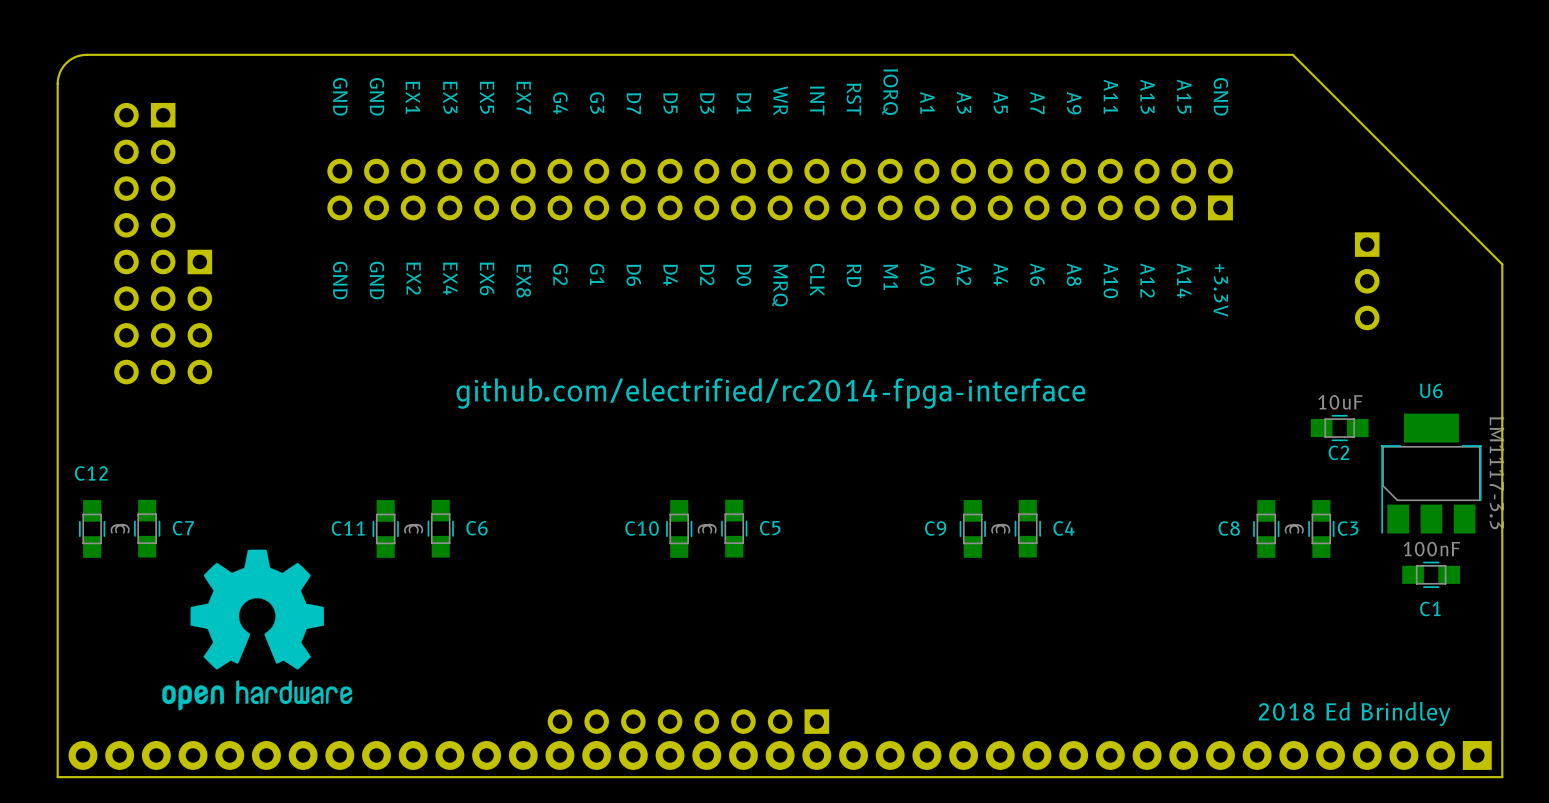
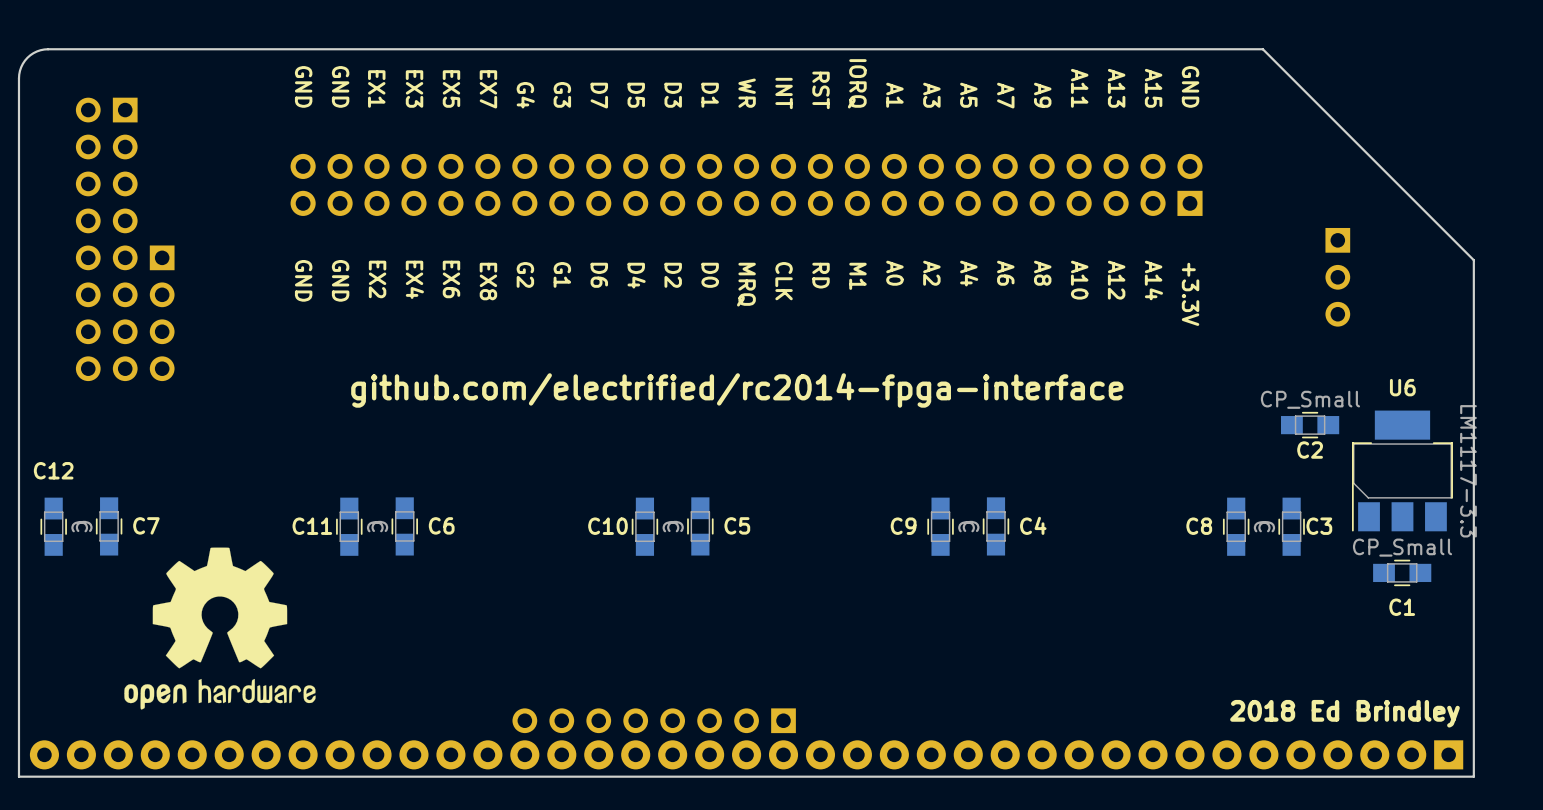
C2 value: 10uF (1340, 402) -> CP_Small (1310, 399)
C1 value: 100nF (1431, 549) -> CP_Small (1402, 547)

